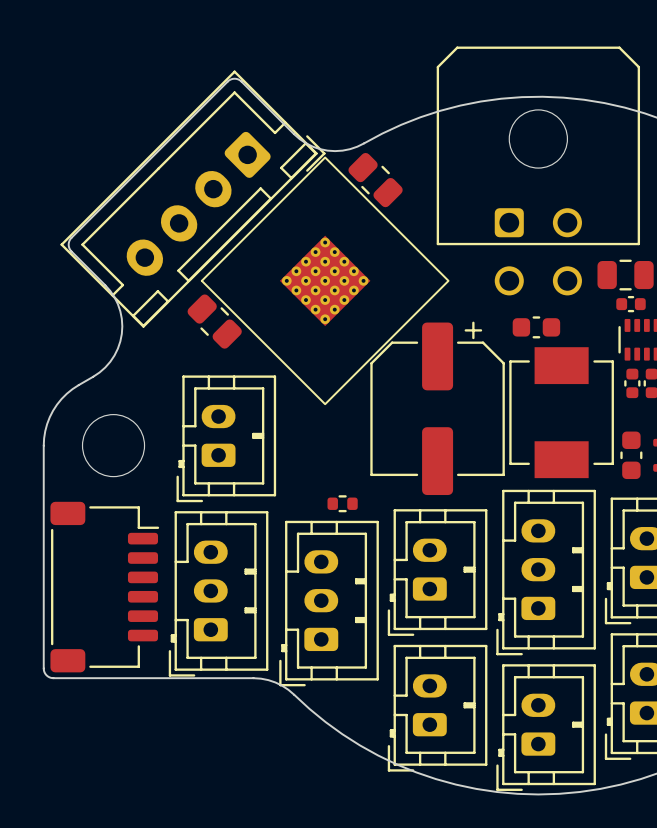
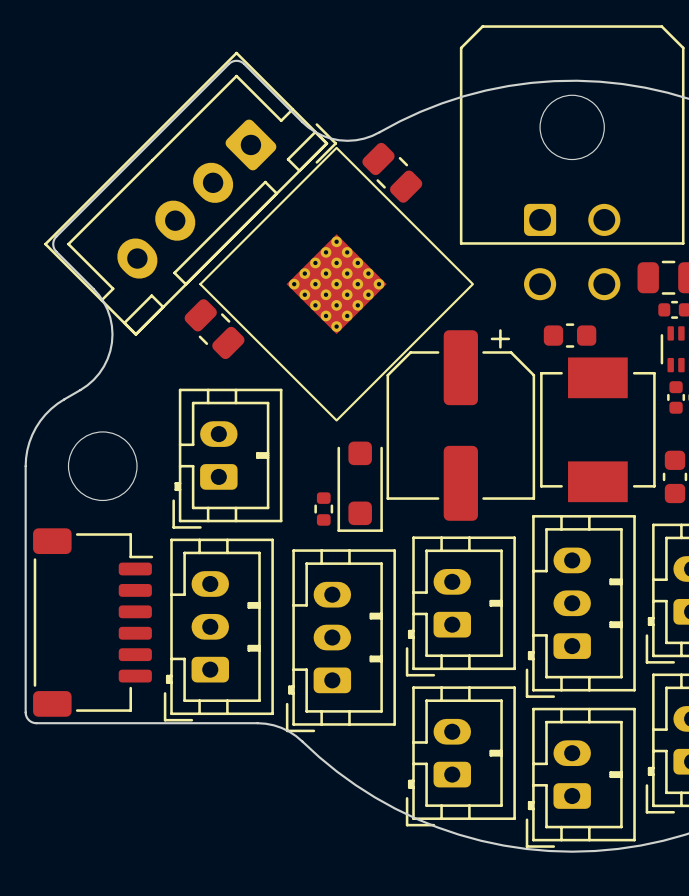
part: none -> (360, 486)
part rotation: 0° (342, 503) -> 90° clockwise (323, 509)
part position: (342, 503) -> (323, 509)

